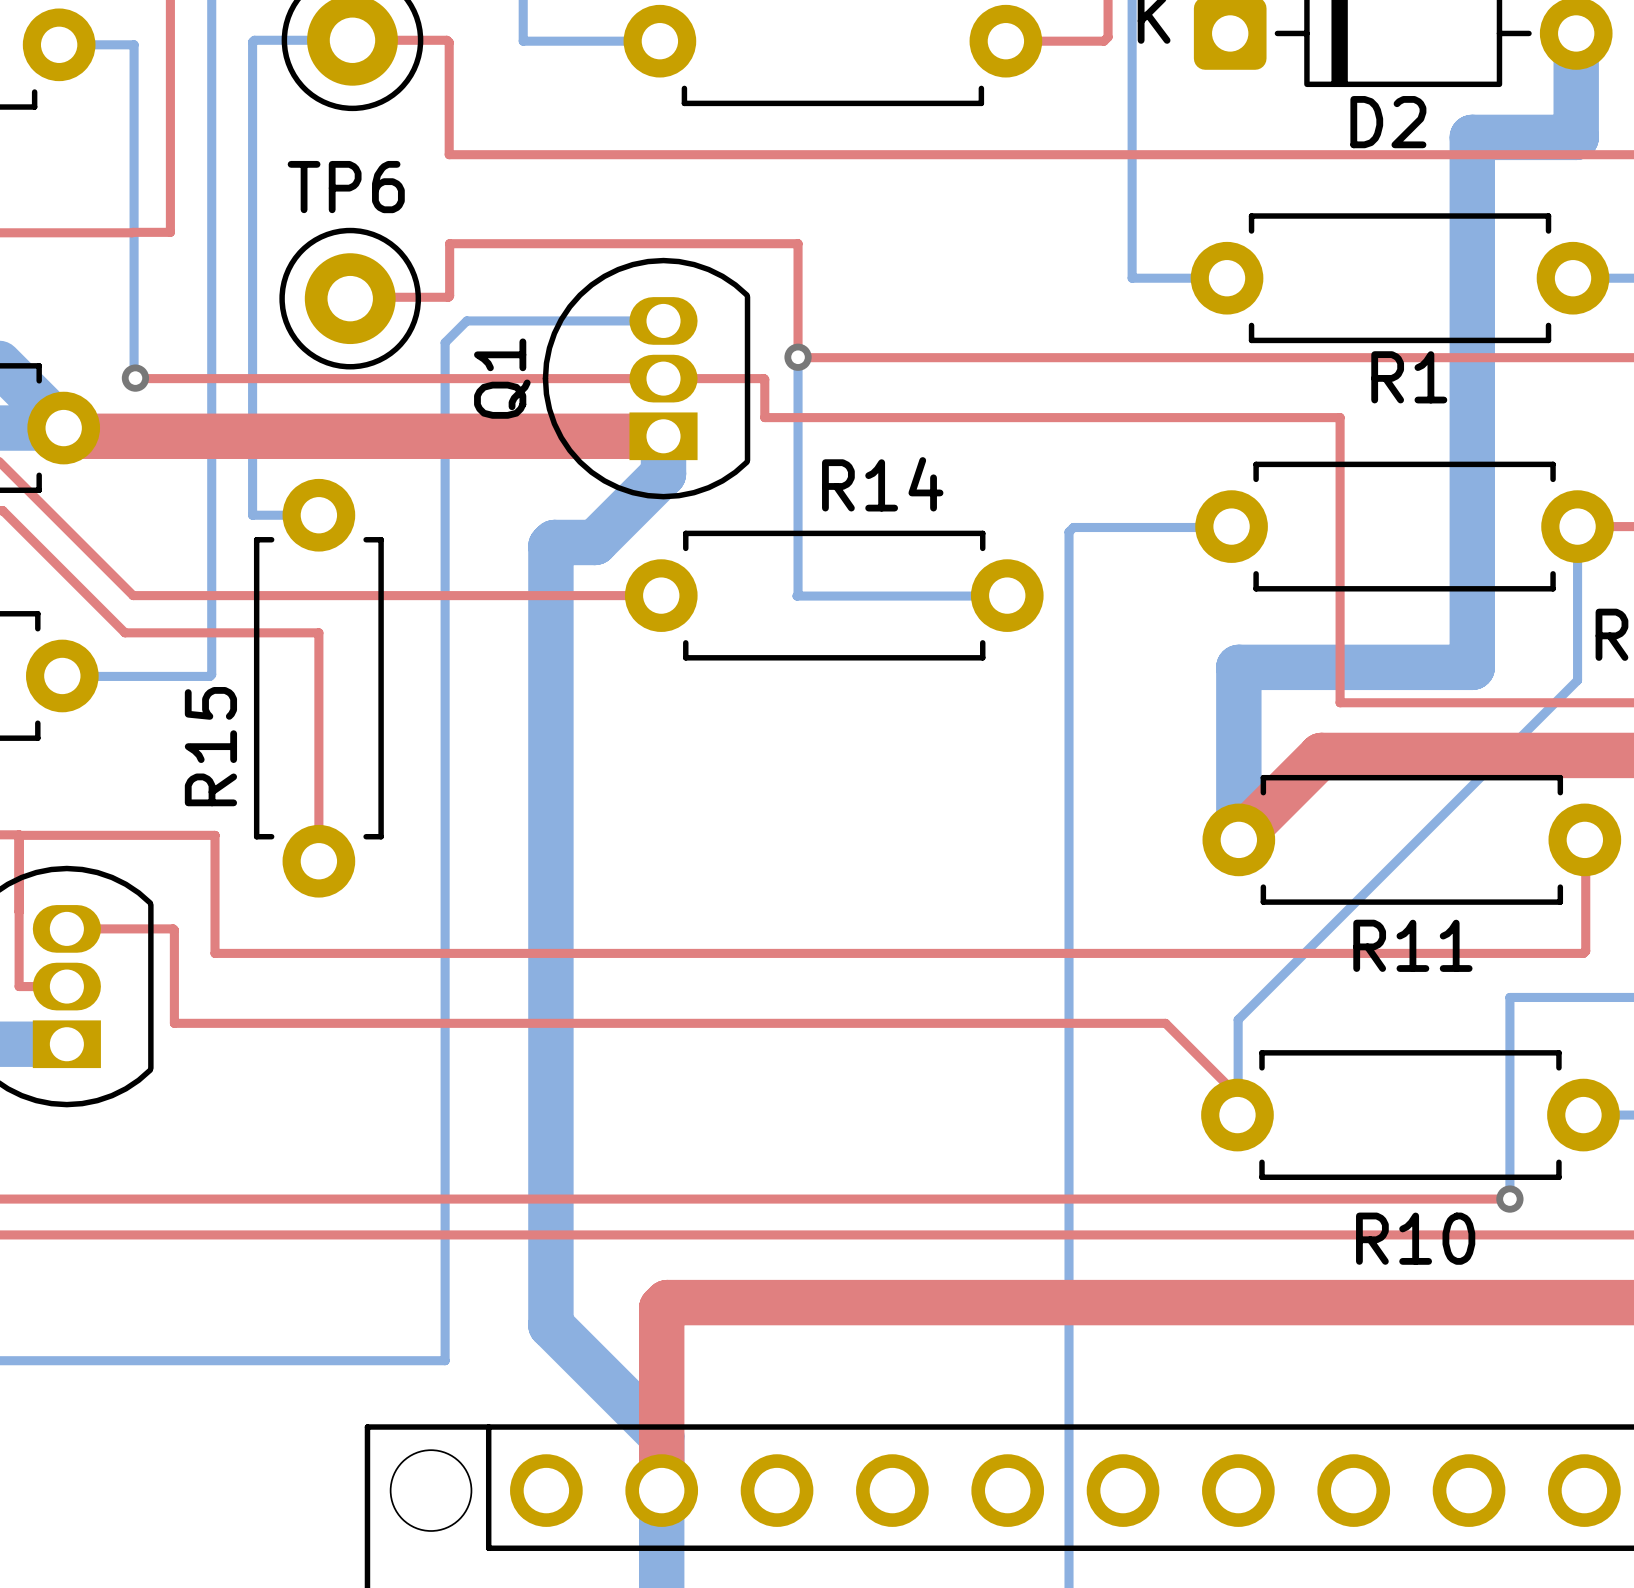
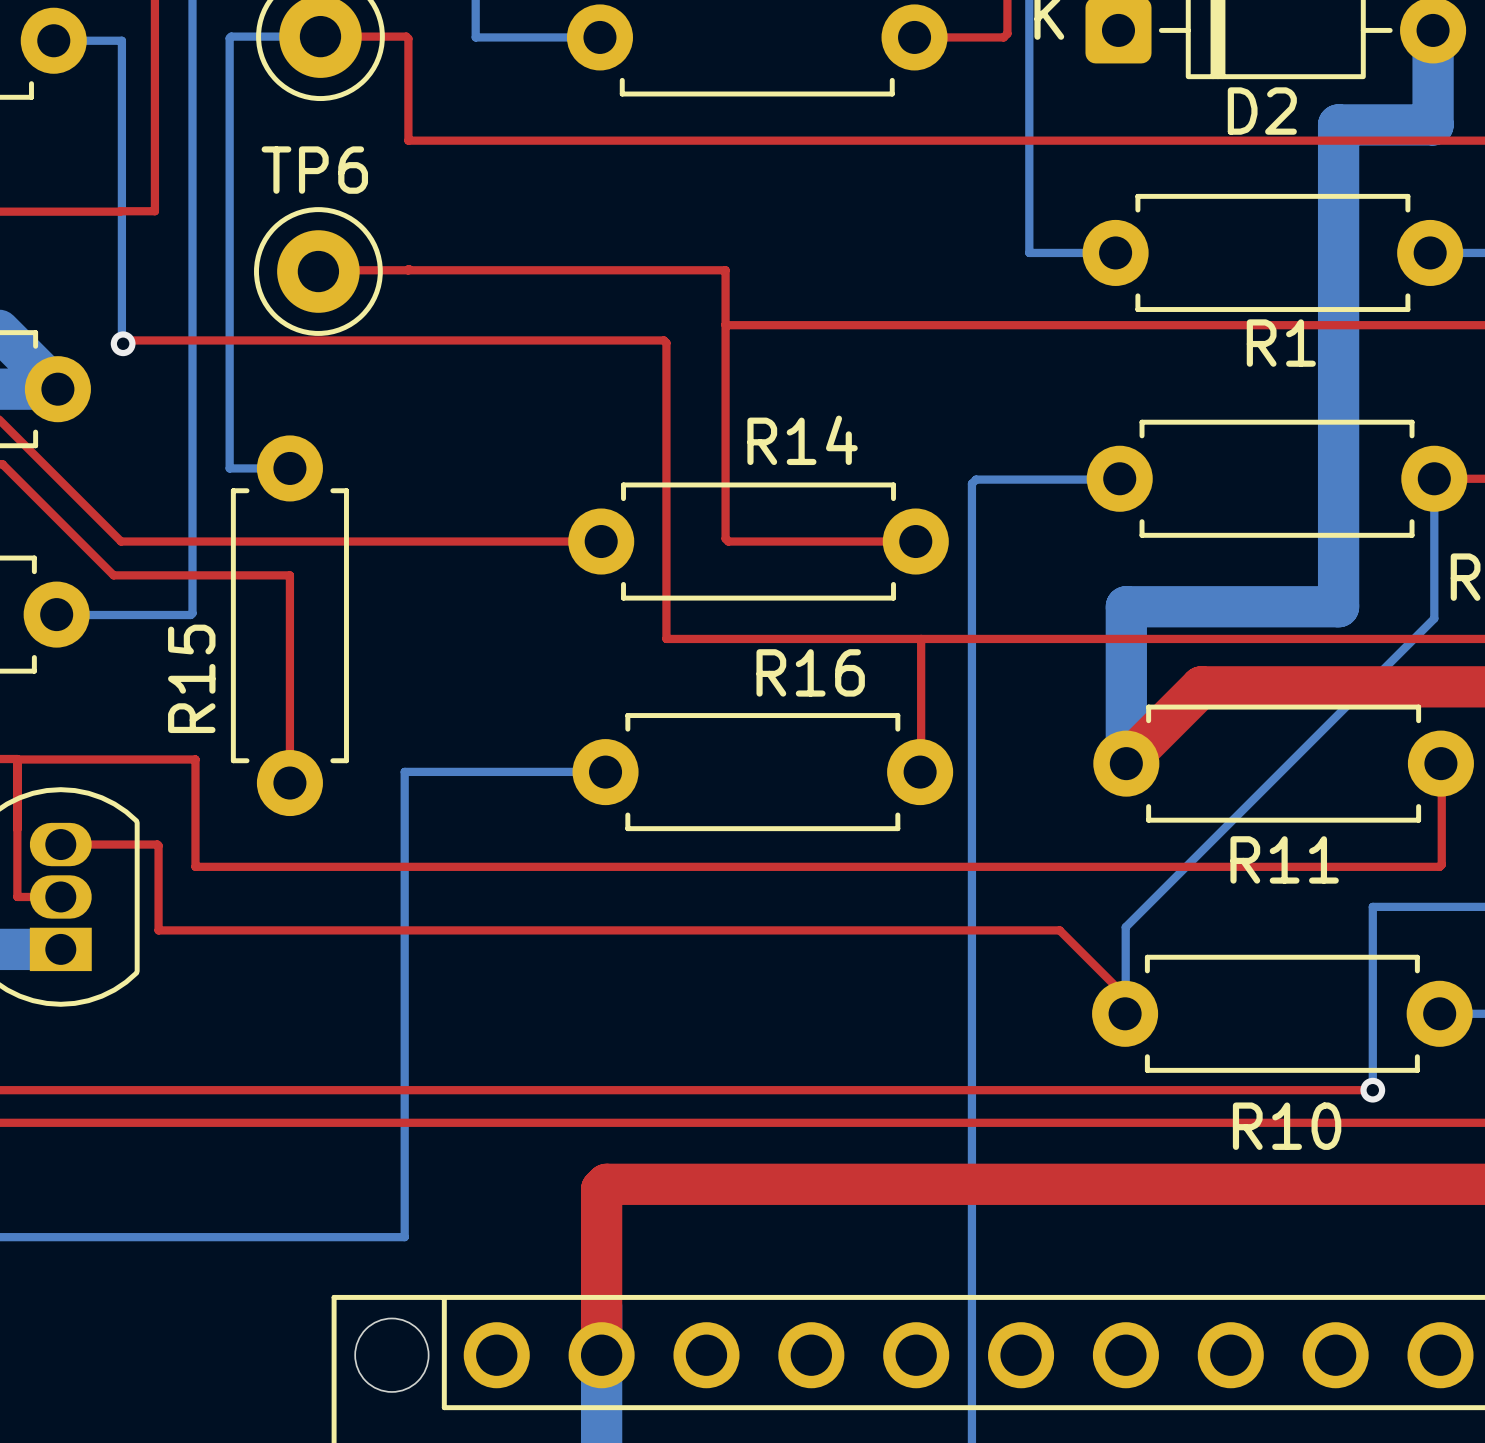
top track: (449, 295) (449, 243) (798, 243) (798, 297) -> (408, 269) (725, 270)
bottom track: (663, 320) (466, 320) (445, 342) (445, 848) -> (600, 771) (404, 771)
bottom track: (798, 357) (797, 596) (1006, 596) -> none
top track: none -> (725, 324) (725, 538) (728, 541) (915, 541)
via: (798, 357) -> none
top track: (135, 378) (763, 378) (764, 417) (1340, 417) (1340, 702) -> (123, 343) (126, 340) (663, 340) (666, 342) (666, 638) (1218, 638)
Q1: (646, 378) -> none
top track: (71, 436) (663, 436) (670, 443) -> none
bottom track: (663, 436) (663, 473) (594, 542) (554, 542) (550, 546) (550, 1325) (661, 1436) -> none
top track: none -> (921, 638) (921, 778)
R16: none -> (762, 772)

